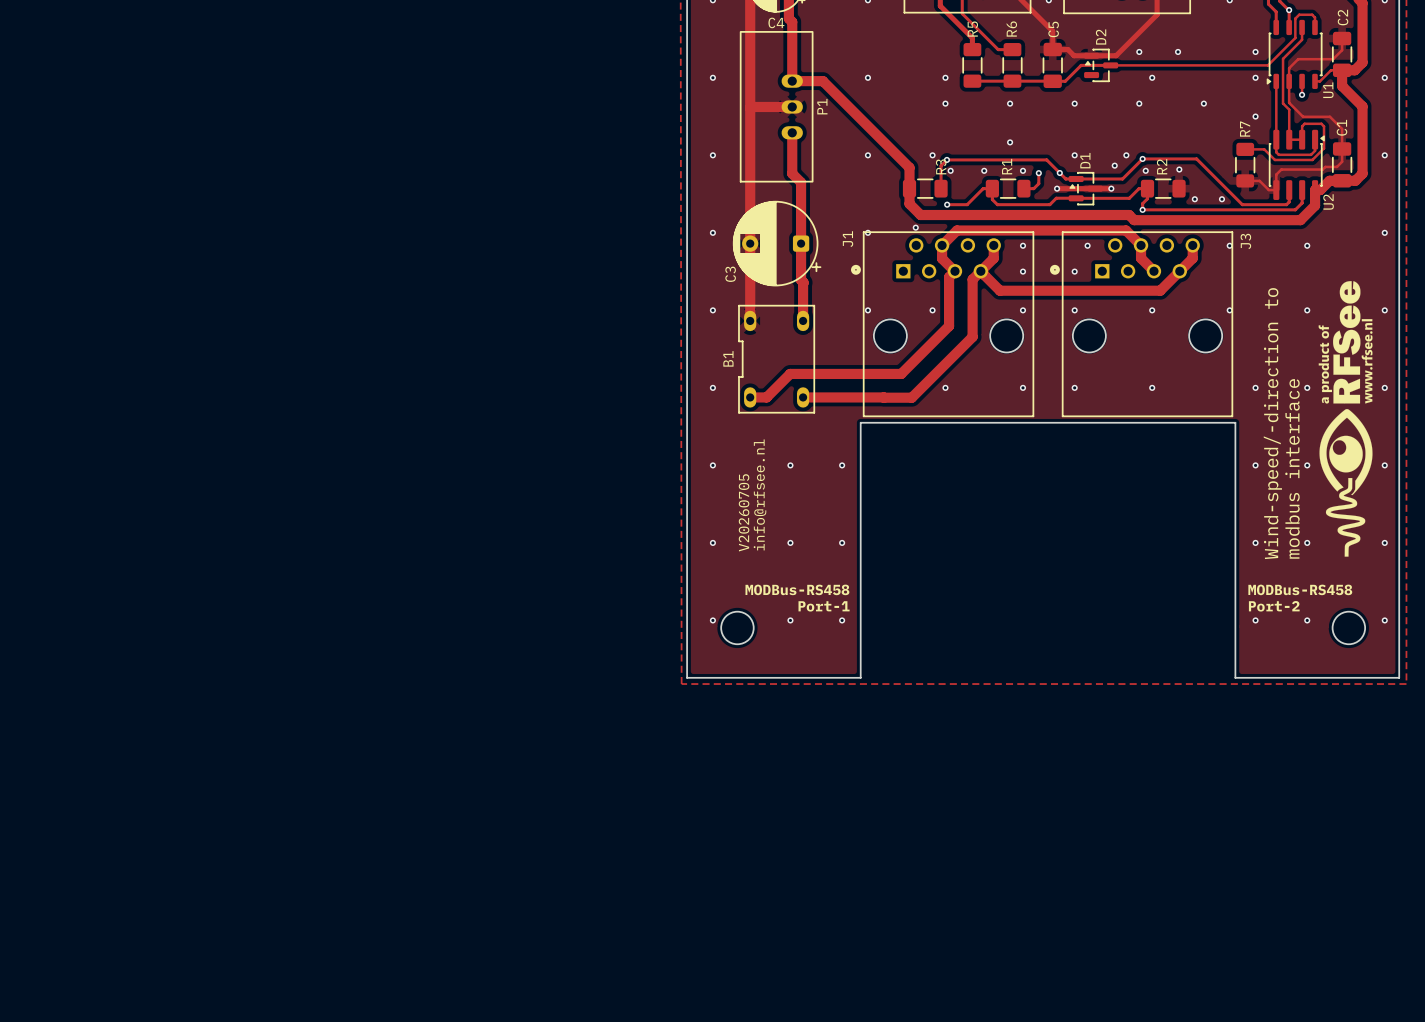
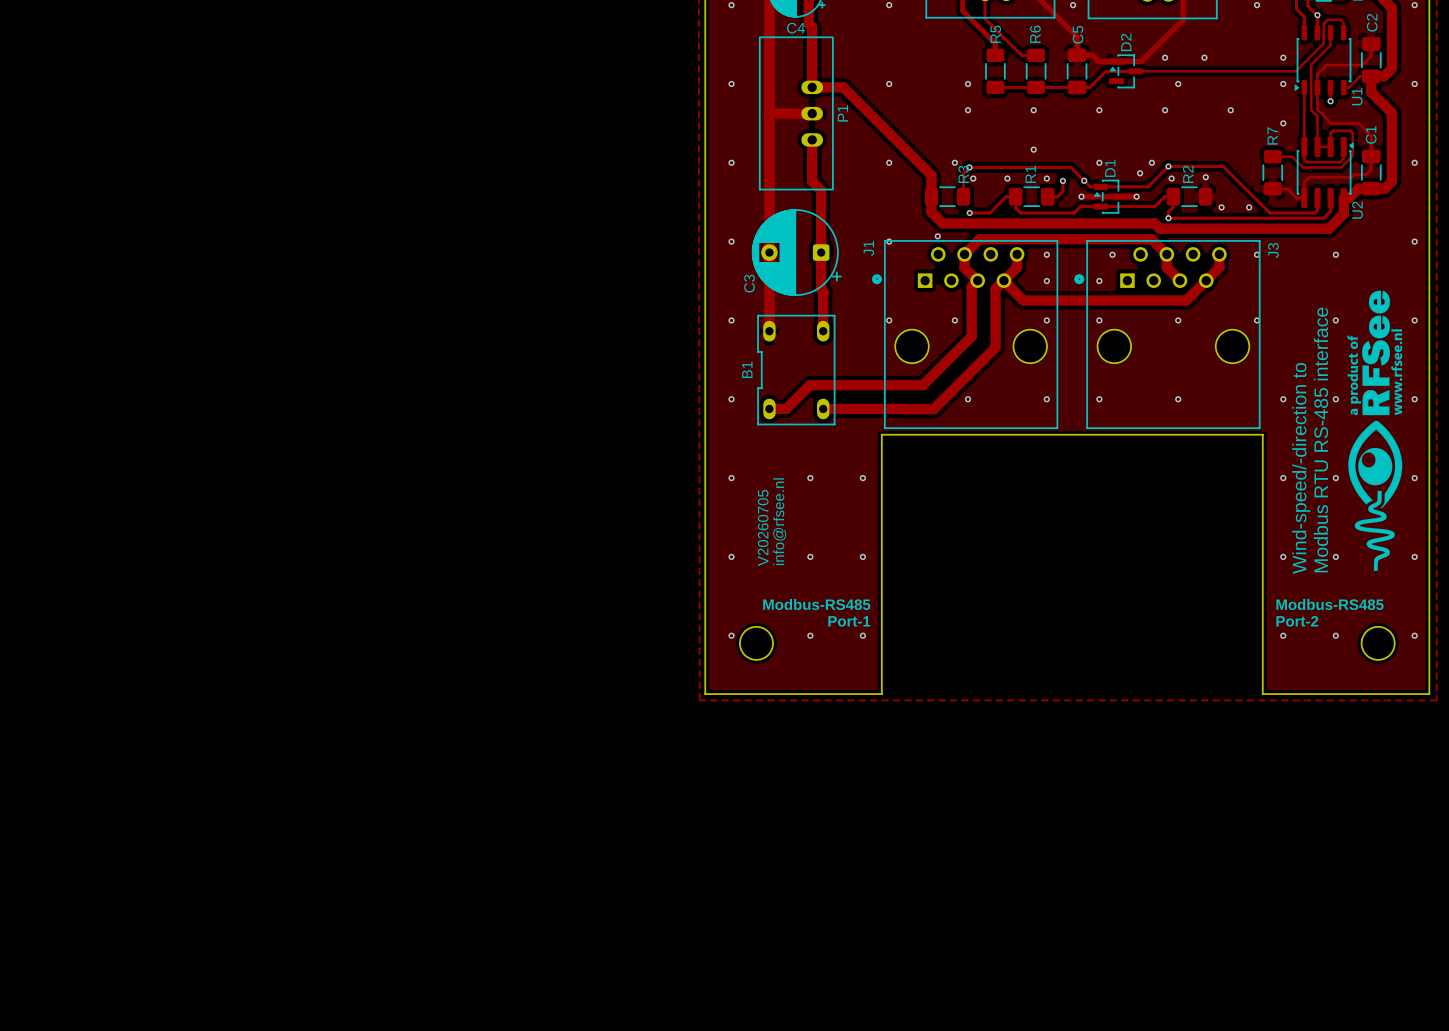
text: modbus interface (1292, 468) -> Modbus RTU RS-485 interface (1320, 439)
text: MODBus-RS458 (797, 589) -> Modbus-RS485 (816, 604)
text: MODBus-RS458 (1300, 589) -> Modbus-RS485 (1330, 604)

